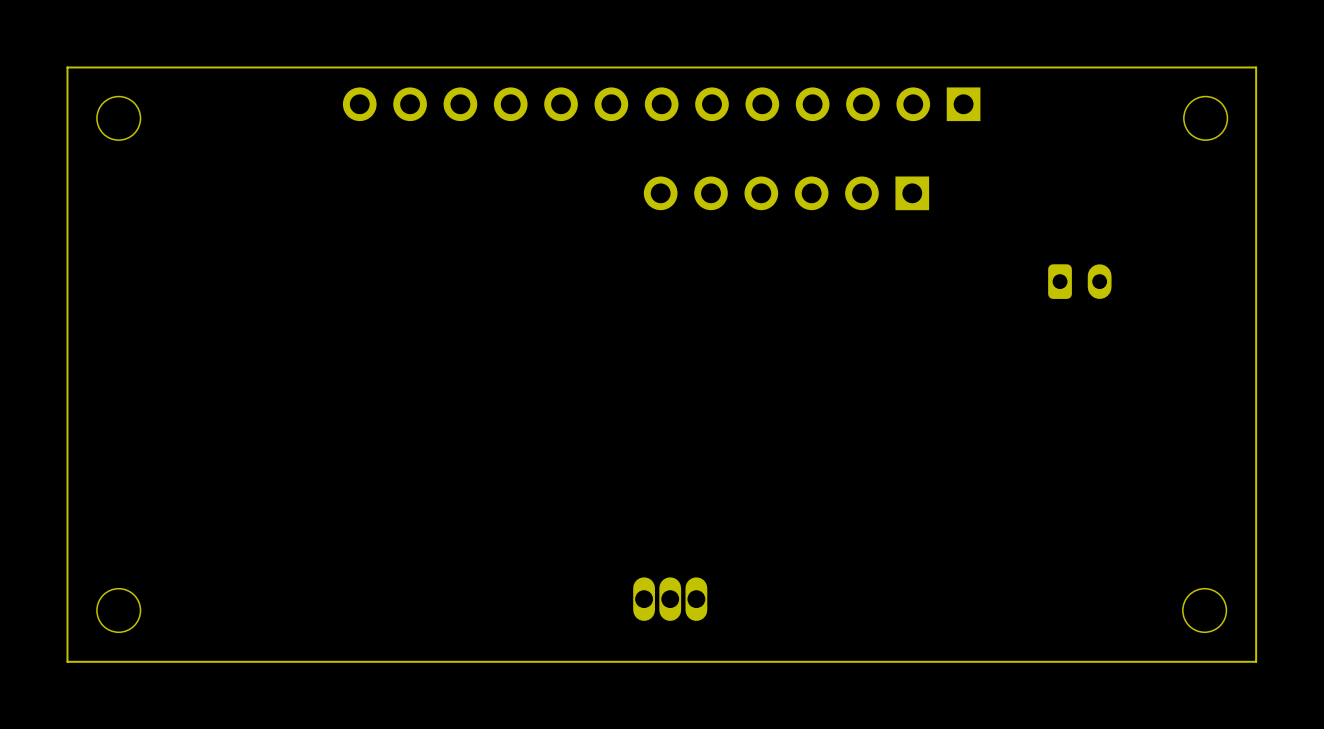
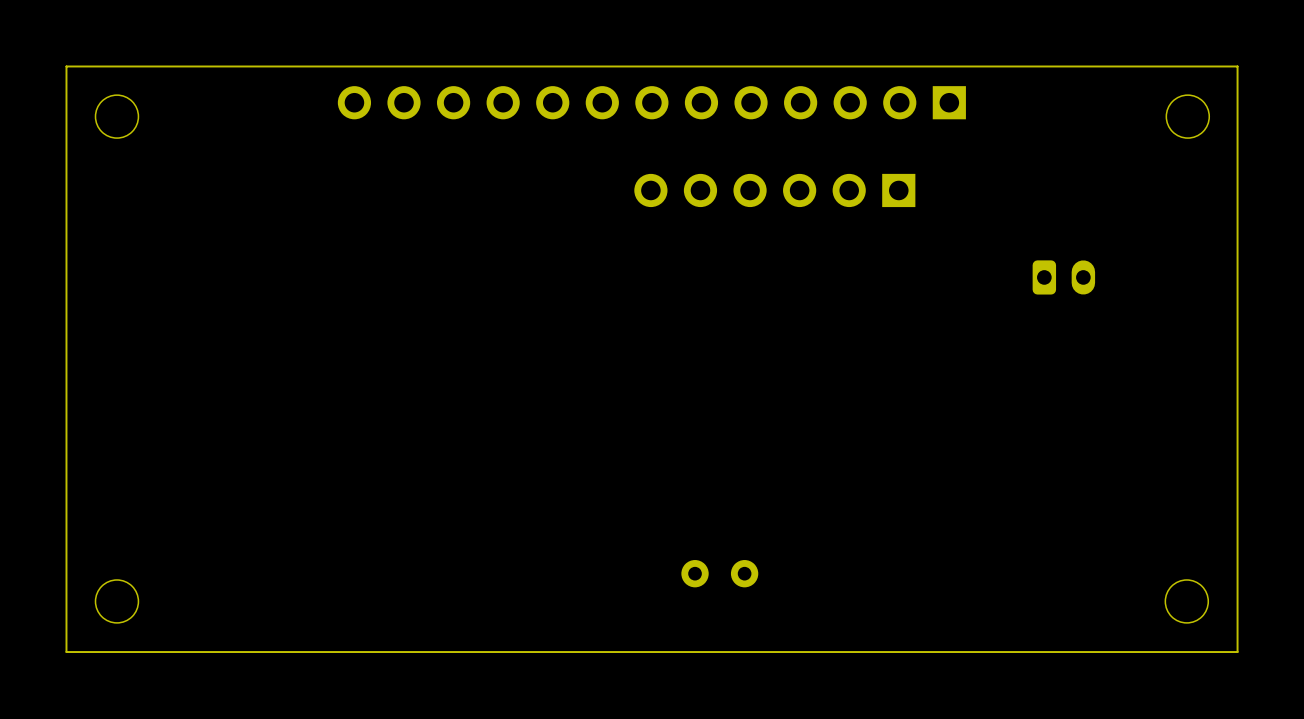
part: none -> (719, 573)
part: (670, 599) -> none

